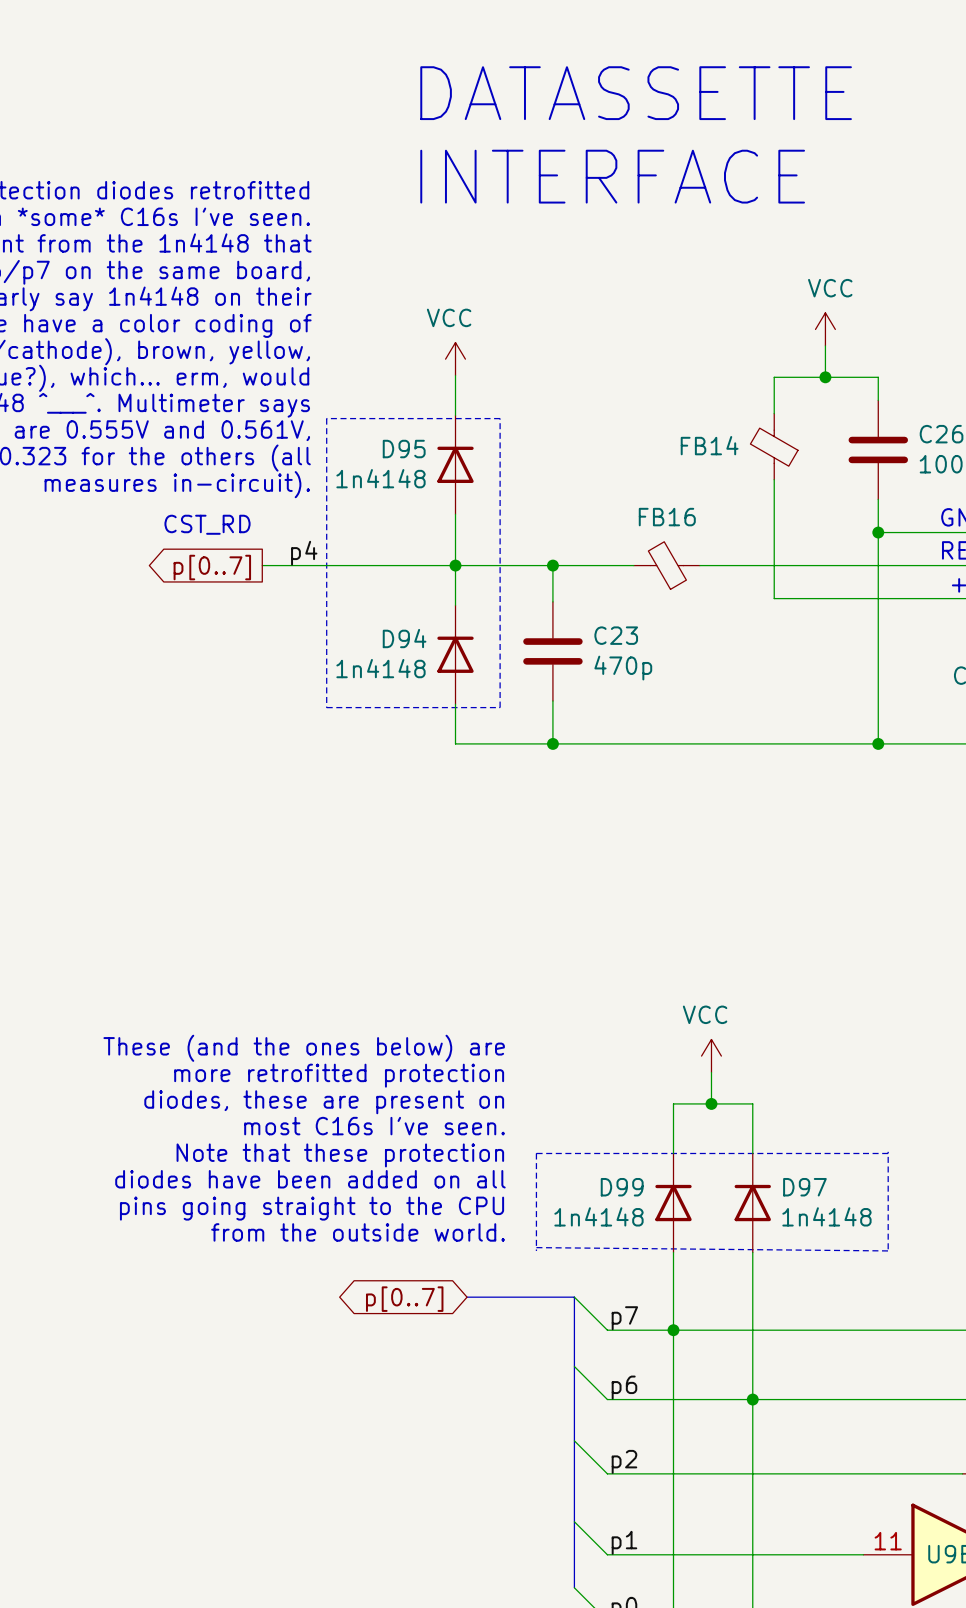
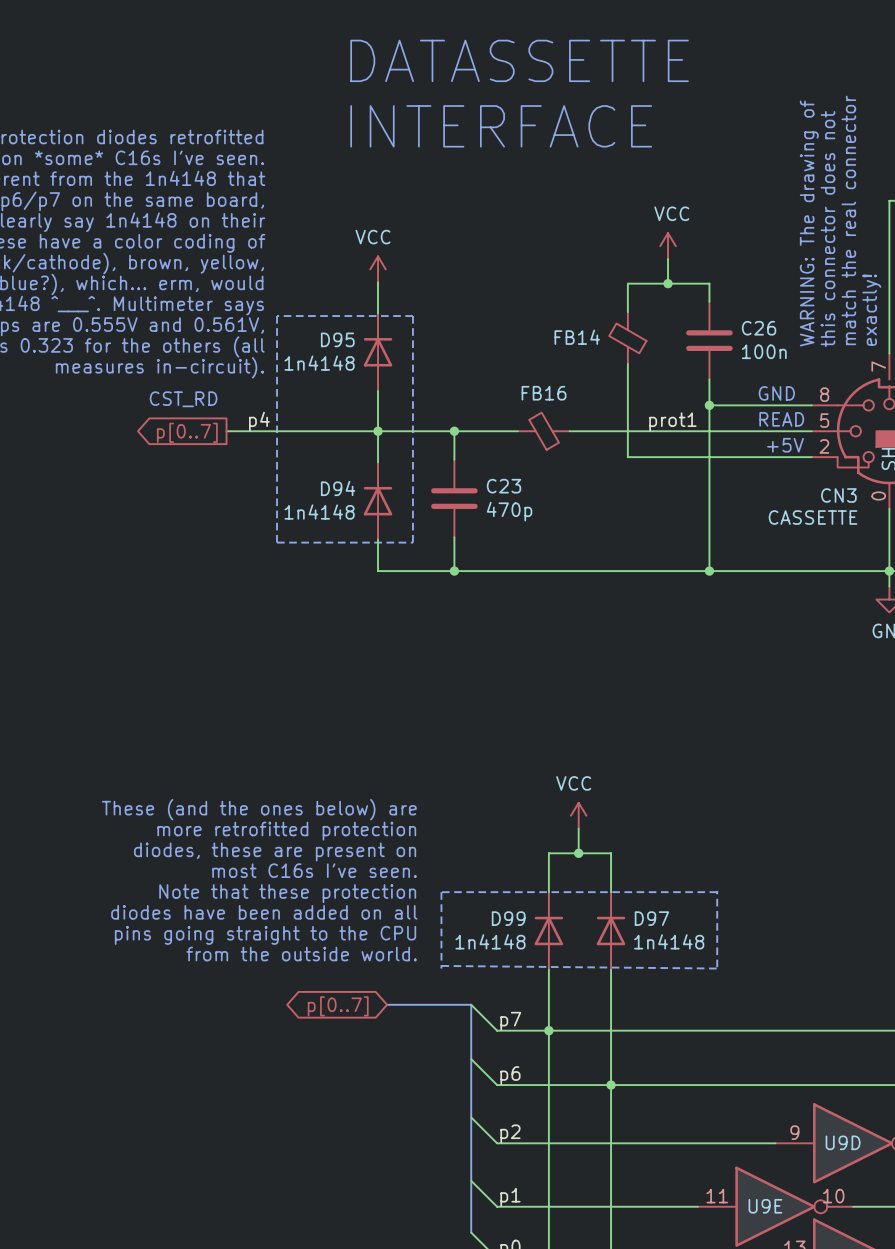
label: none -> prot1 (672, 421)

